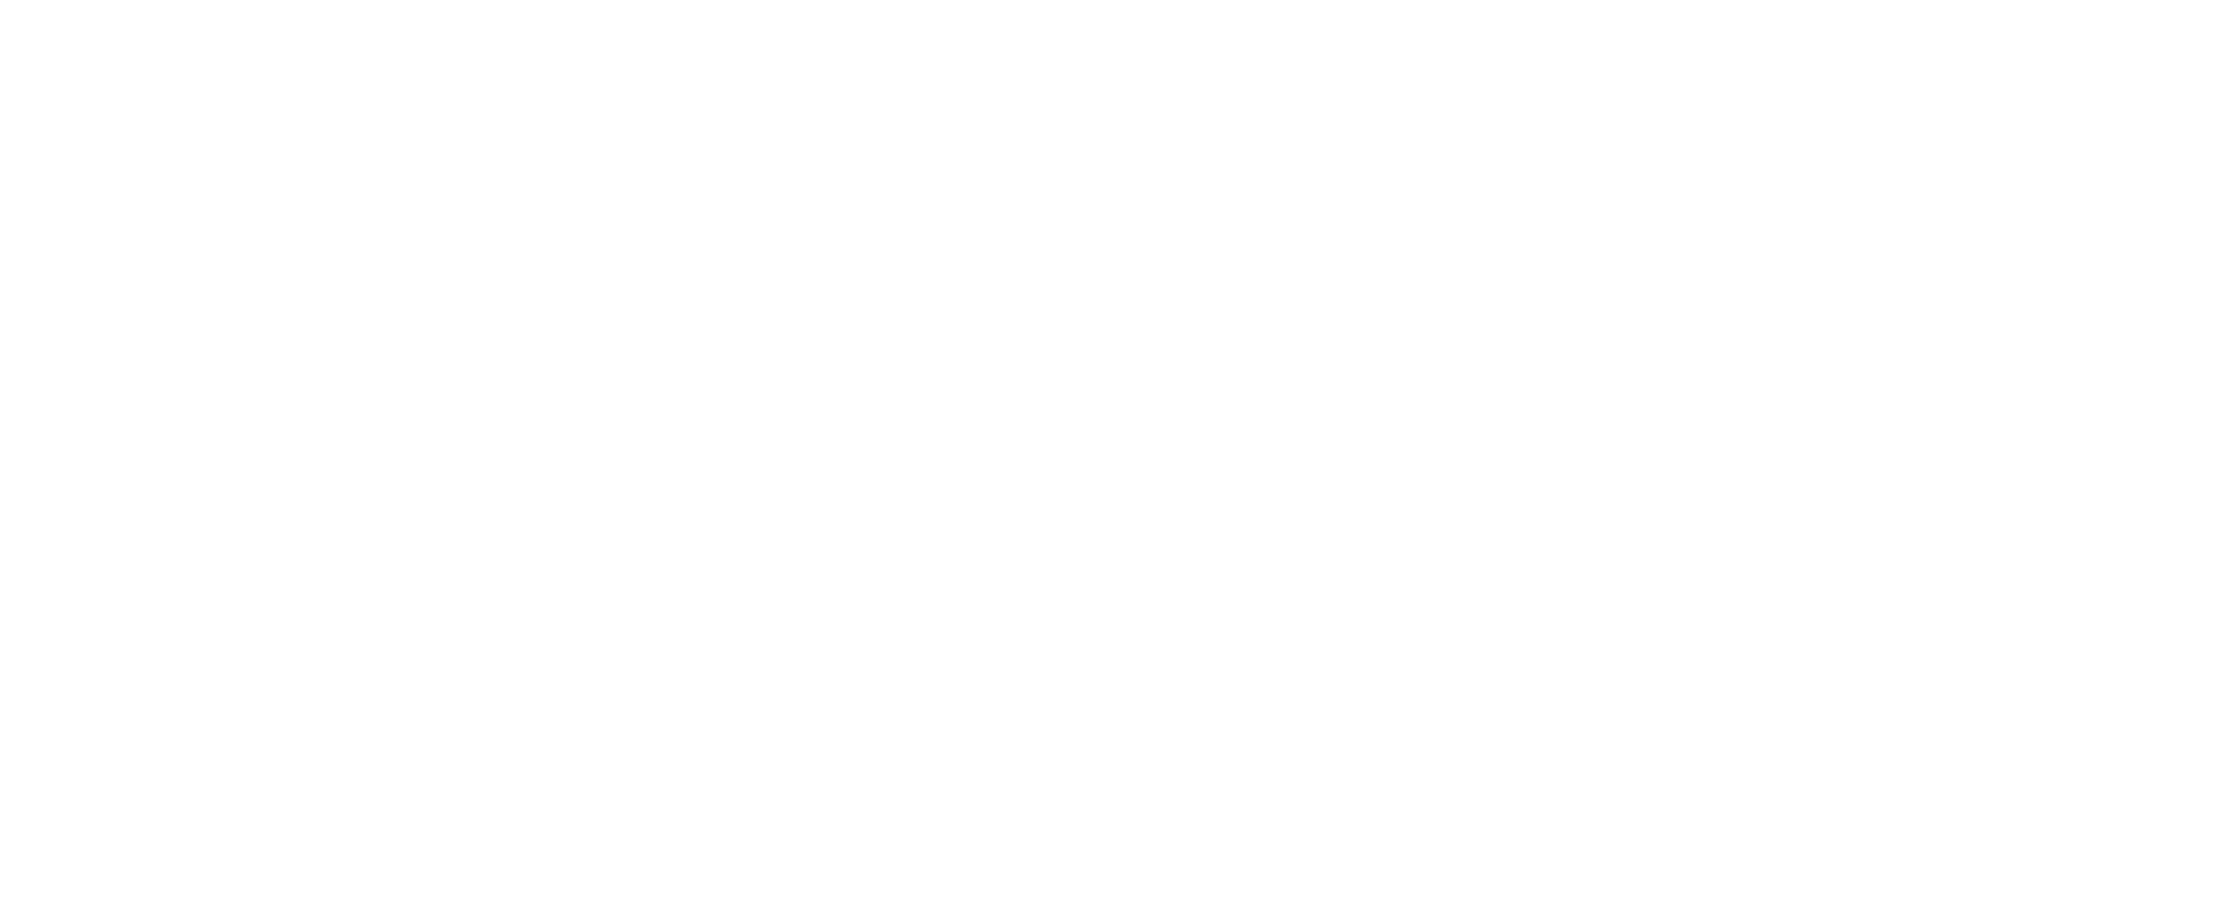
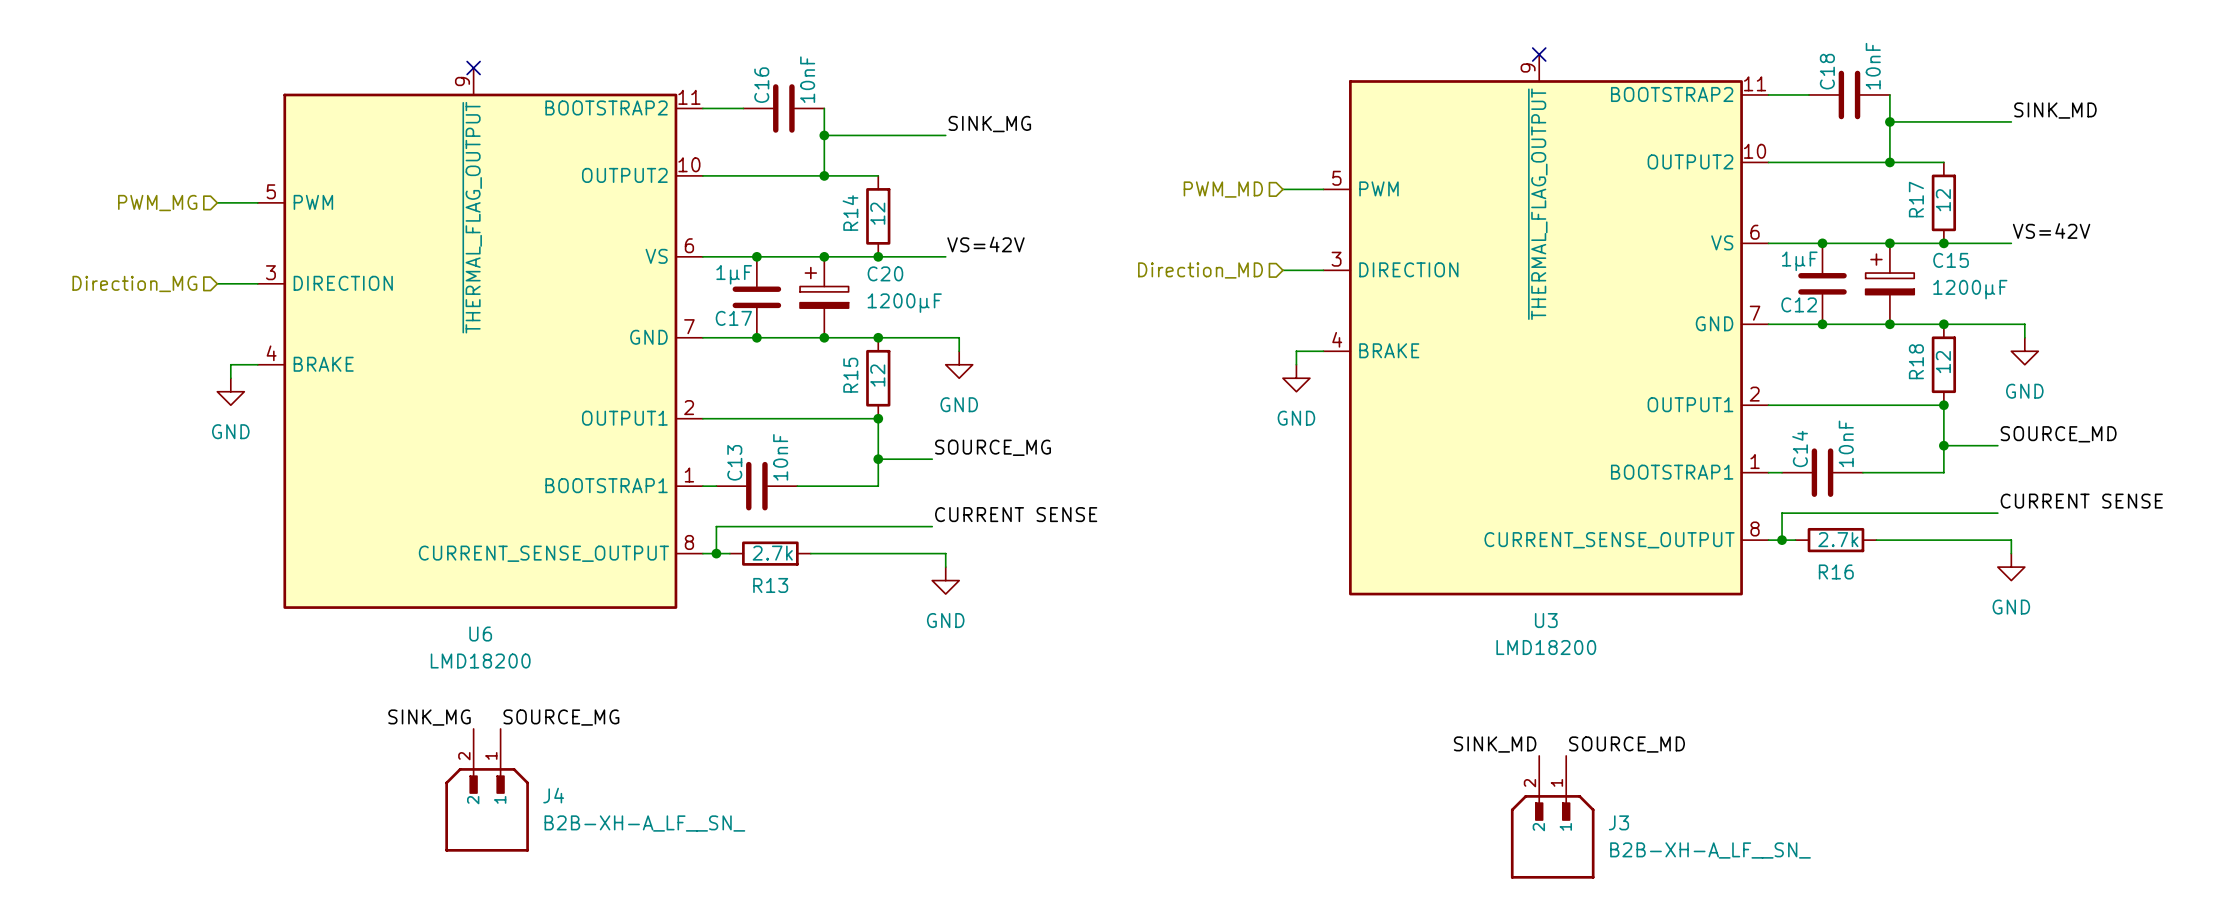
no-connect mark: none -> (1539, 54)
no-connect mark: none -> (473, 68)
wire: none -> (1768, 94) (1809, 94)
C18: none -> 10nF (1849, 94)
wire: none -> (1889, 94) (1889, 162)
wire: none -> (702, 108) (743, 108)
C16: none -> 10nF (783, 108)
wire: none -> (824, 108) (824, 175)
label: none -> SINK_MD (2055, 110)
wire: none -> (1889, 121) (2011, 121)
junction: none -> (1889, 121)
label: none -> SINK_MG (989, 124)
wire: none -> (824, 135) (945, 135)
junction: none -> (824, 135)
wire: none -> (1768, 162) (1943, 162)
junction: none -> (1889, 162)
wire: none -> (702, 175) (878, 175)
junction: none -> (824, 175)
wire: none -> (1282, 189) (1323, 189)
hierarchical label: none -> PWM_MD (1223, 189)
wire: none -> (217, 202) (257, 202)
R17: none -> 12 (1943, 202)
hierarchical label: none -> PWM_MG (157, 203)
R14: none -> 12 (878, 216)
label: none -> VS=42V (2051, 231)
wire: none -> (1768, 243) (2011, 243)
junction: none -> (1822, 243)
junction: none -> (1889, 243)
junction: none -> (1943, 243)
label: none -> VS=42V (985, 244)
wire: none -> (702, 256) (945, 256)
junction: none -> (756, 256)
junction: none -> (824, 256)
junction: none -> (878, 256)
hierarchical label: none -> Direction_MD (1200, 270)
wire: none -> (1282, 270) (1323, 270)
wire: none -> (217, 283) (257, 283)
C12: none -> 1µF (1822, 283)
C15: none -> 1200µF (1889, 283)
hierarchical label: none -> Direction_MG (134, 283)
C17: none -> 1µF (756, 297)
C20: none -> 1200µF (824, 297)
U3: none -> LMD18200 (1545, 324)
wire: none -> (1768, 324) (2024, 324) (2024, 337)
junction: none -> (1822, 324)
junction: none -> (1889, 324)
junction: none -> (1943, 324)
wire: none -> (702, 337) (959, 337) (959, 351)
junction: none -> (756, 337)
junction: none -> (824, 337)
junction: none -> (878, 337)
U6: none -> LMD18200 (480, 338)
wire: none -> (1323, 351) (1296, 351) (1296, 364)
power symbol: none -> GND (2024, 351)
wire: none -> (257, 364) (230, 364) (230, 378)
power symbol: none -> GND (959, 364)
R18: none -> 12 (1943, 364)
R15: none -> 12 (878, 378)
power symbol: none -> GND (1296, 378)
power symbol: none -> GND (230, 391)
wire: none -> (1768, 405) (1943, 405) (1943, 472) (1862, 472)
junction: none -> (1943, 405)
wire: none -> (702, 418) (878, 418) (878, 486) (797, 486)
junction: none -> (878, 418)
label: none -> SOURCE_MD (2058, 434)
wire: none -> (1943, 445) (1997, 445)
junction: none -> (1943, 445)
label: none -> SOURCE_MG (993, 447)
wire: none -> (878, 459) (932, 459)
junction: none -> (878, 459)
wire: none -> (1768, 472) (1782, 472)
C14: none -> 10nF (1822, 472)
wire: none -> (702, 486) (716, 486)
C13: none -> 10nF (756, 486)
label: none -> CURRENT SENSE (2081, 501)
wire: none -> (1997, 513) (1782, 513) (1782, 540)
label: none -> CURRENT SENSE (1016, 514)
wire: none -> (932, 526) (716, 526) (716, 553)
wire: none -> (1768, 540) (1795, 540)
junction: none -> (1782, 540)
R16: none -> 2.7k (1835, 540)
wire: none -> (1876, 540) (2011, 540) (2011, 553)
wire: none -> (702, 553) (729, 553)
junction: none -> (716, 553)
R13: none -> 2.7k (770, 553)
wire: none -> (810, 553) (945, 553) (945, 567)
power symbol: none -> GND (2011, 567)
power symbol: none -> GND (945, 580)
label: none -> SINK_MG (429, 717)
label: none -> SOURCE_MG (561, 717)
label: none -> SINK_MD (1495, 744)
label: none -> SOURCE_MD (1627, 744)
J4: none -> B2B-XH-A_LF__SN_ (487, 790)
J3: none -> B2B-XH-A_LF__SN_ (1552, 817)

